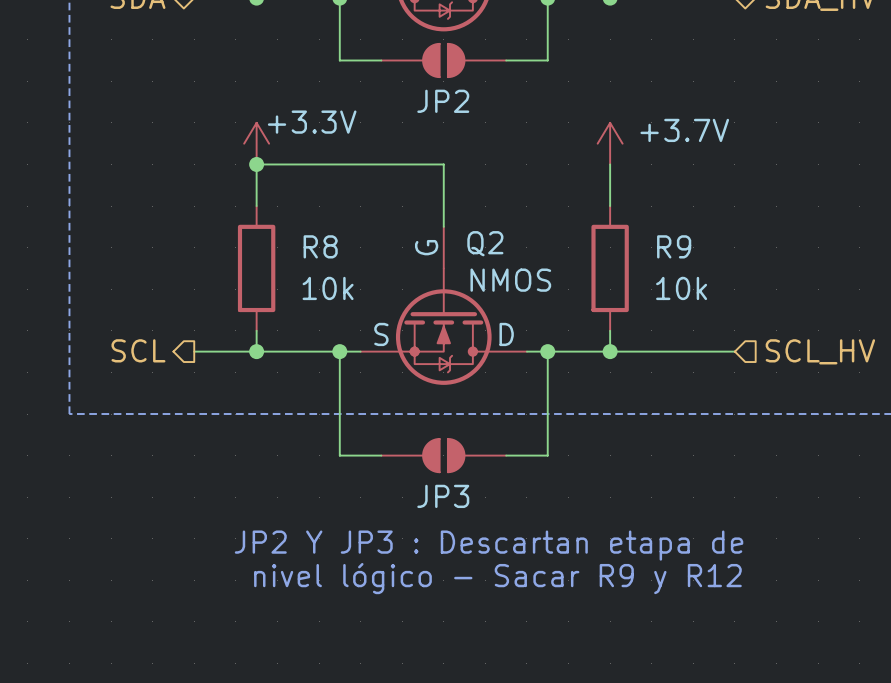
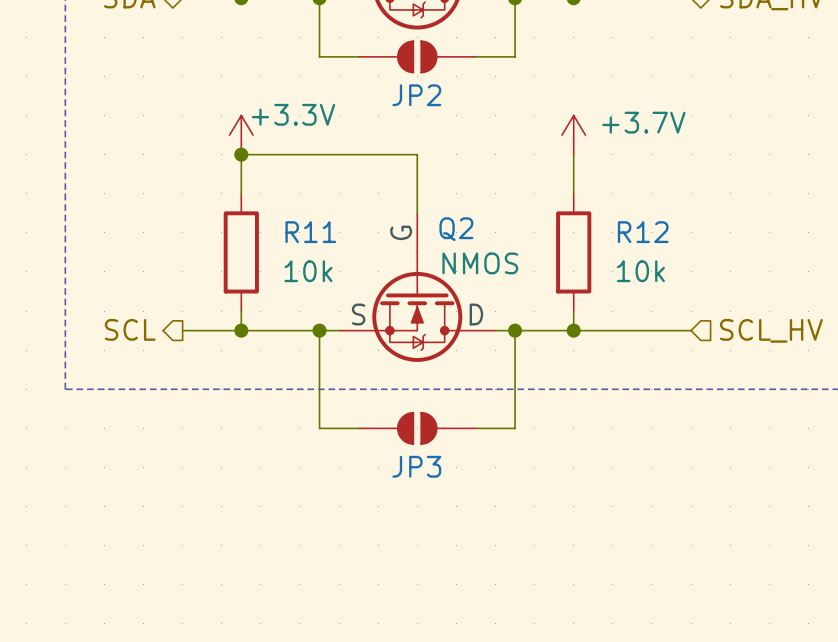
R8 name: R8 (320, 246) -> R11 (310, 232)
R9 name: R9 (674, 246) -> R12 (643, 232)
text: JP2 Y JP3 : Descartan etapa de (489, 545) -> none
text: nivel lógico - Sacar R9 y R12 (497, 578) -> none

